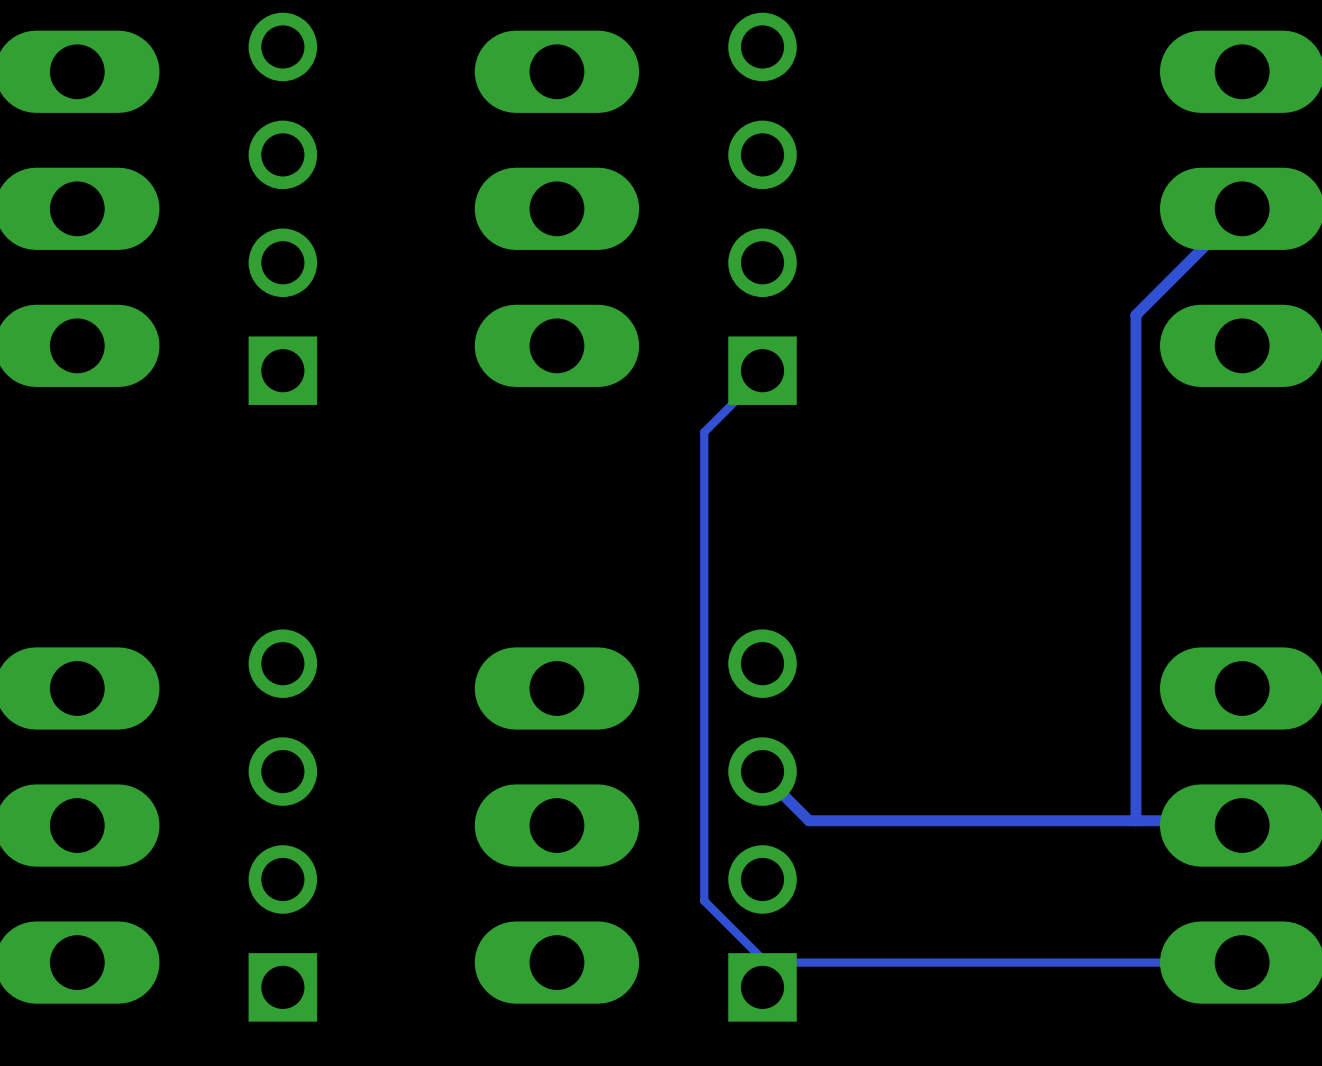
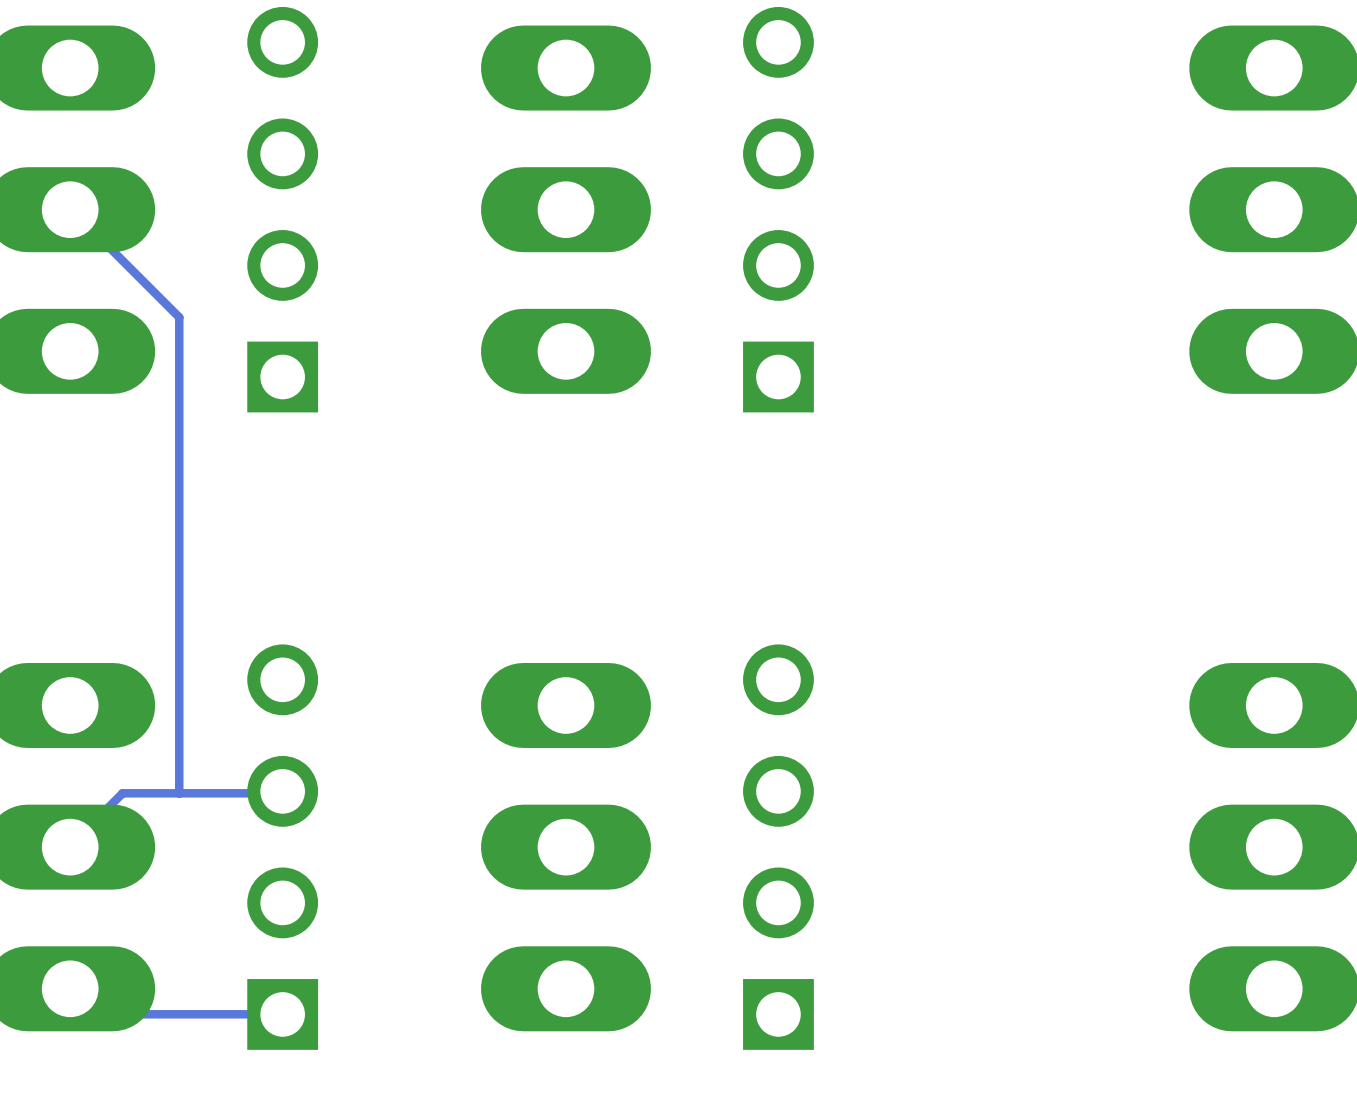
track: none -> (70, 209) (179, 317) (179, 793)
track: (1242, 208) (1135, 315) (1135, 820) -> none
track: (762, 370) (759, 376) (704, 432) (704, 900) (778, 974) (762, 987) (765, 987) (790, 962) (1242, 962) -> none
track: none -> (282, 791) (281, 793) (122, 793) (70, 847)
track: (762, 771) (765, 777) (809, 820) (1240, 820) (1242, 825) -> none
track: none -> (70, 988) (94, 1014) (282, 1014)

